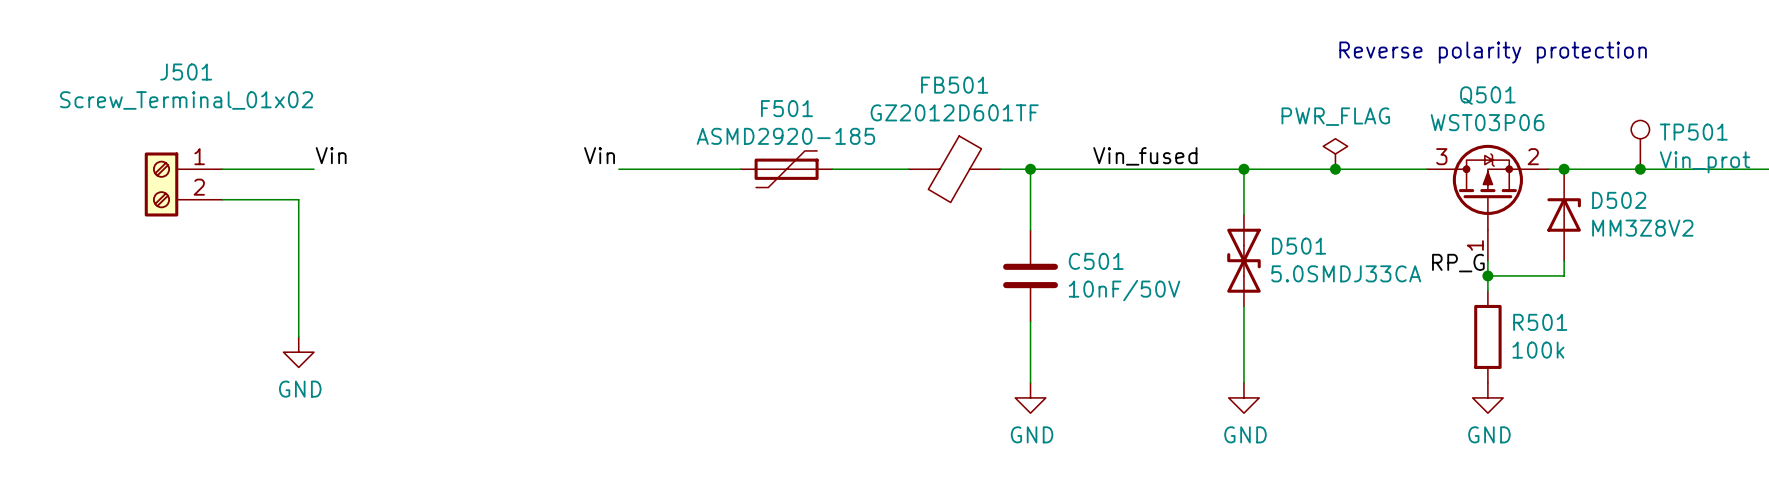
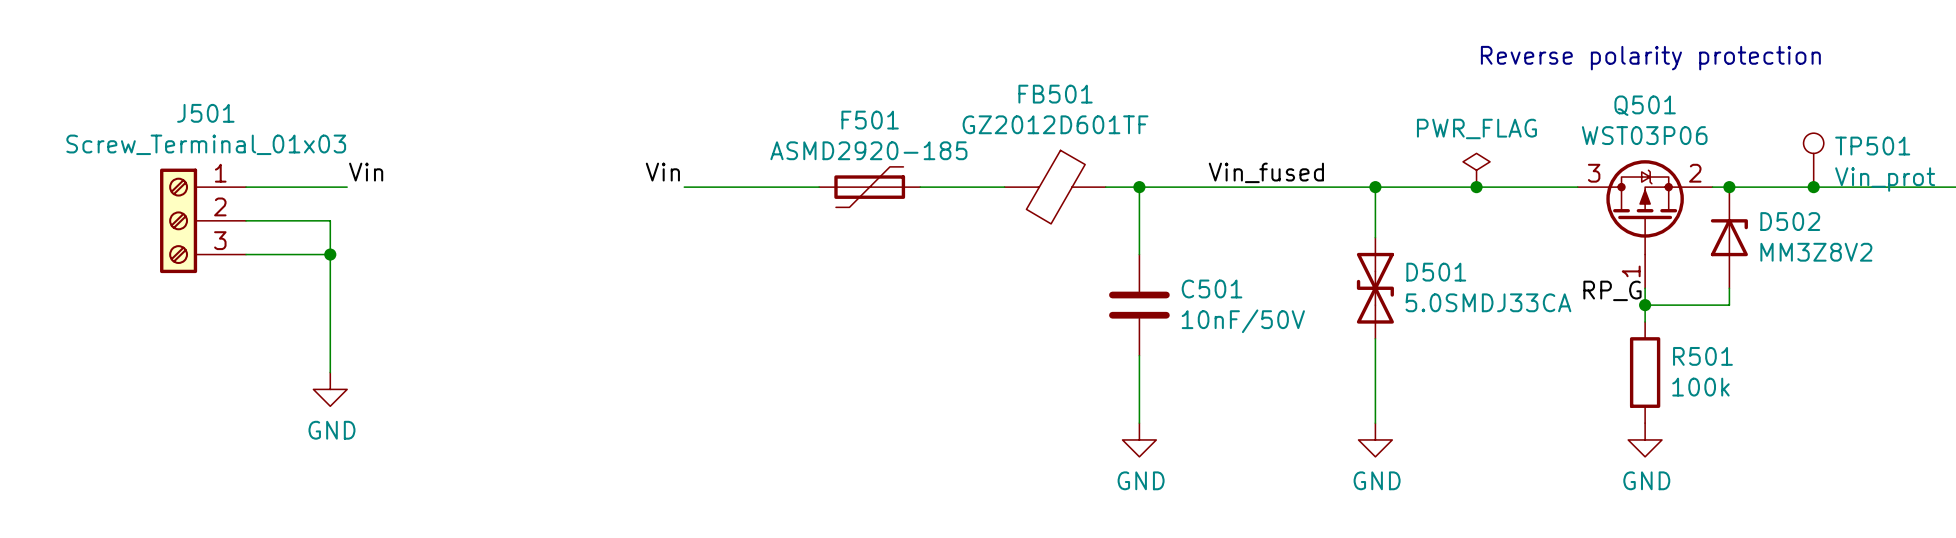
J501 value: Screw_Terminal_01x02 (186, 100) -> Screw_Terminal_01x03 (206, 144)
J501 symbol: [144, 152, 223, 217] -> [160, 168, 247, 274]
wire: none -> (246, 254) (330, 254)
junction: none -> (330, 254)

